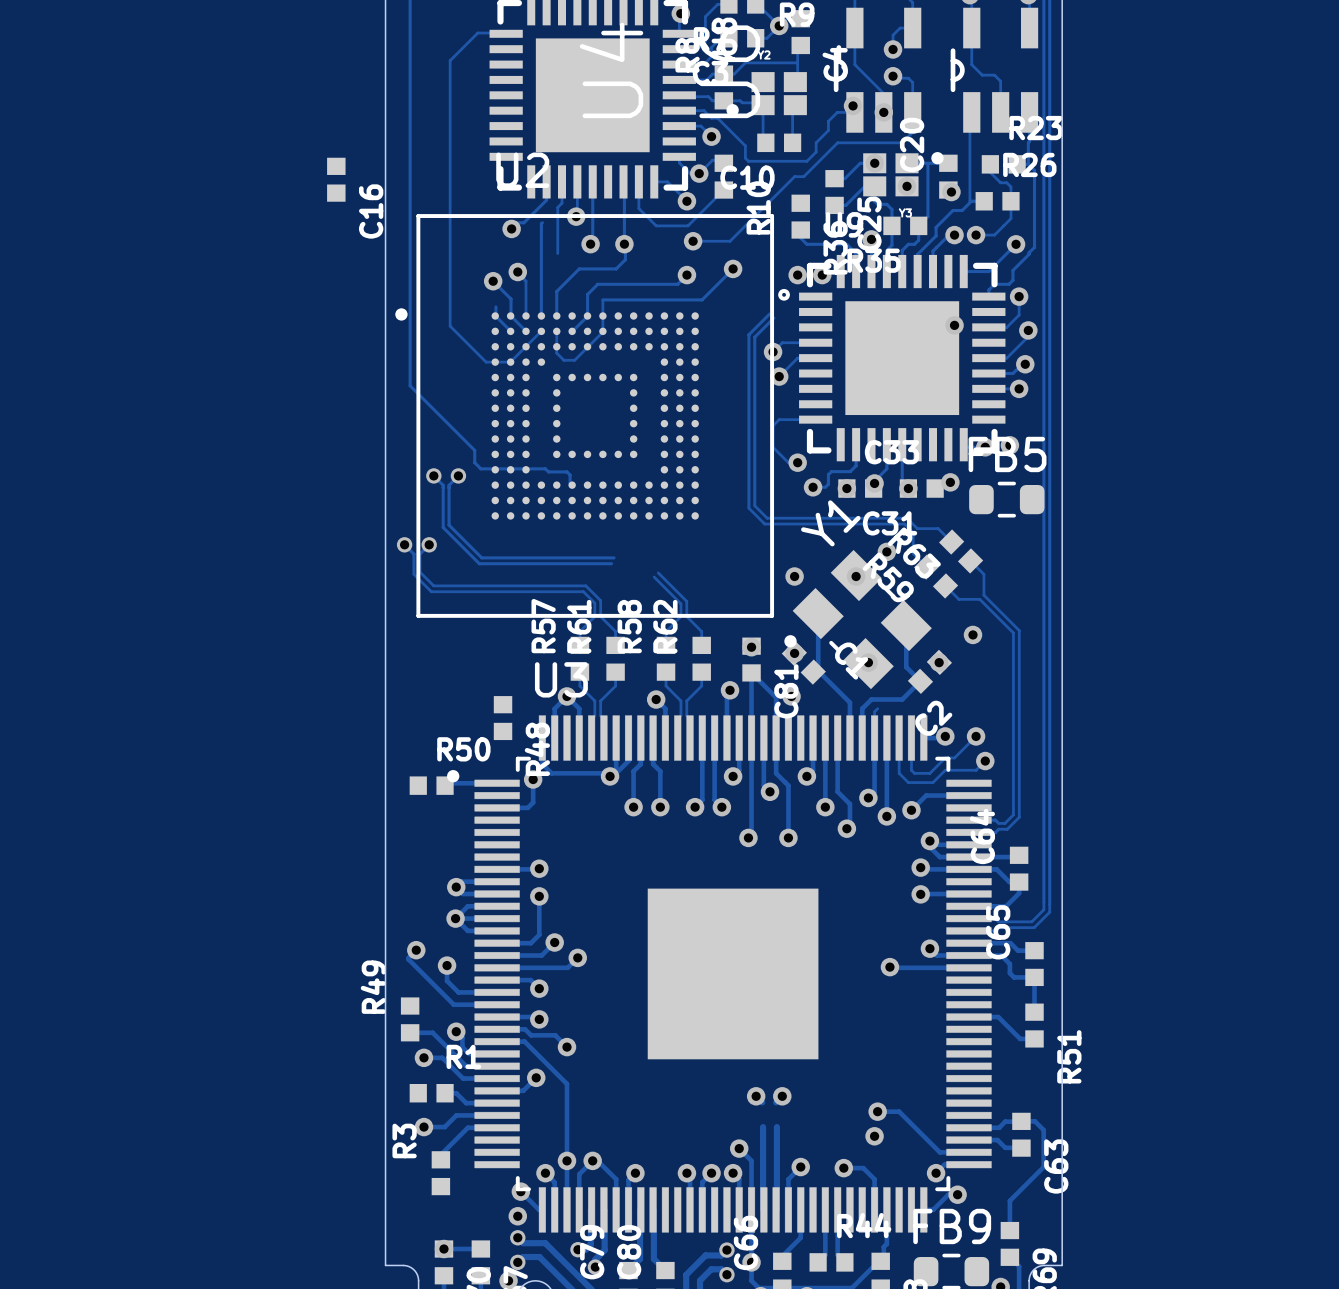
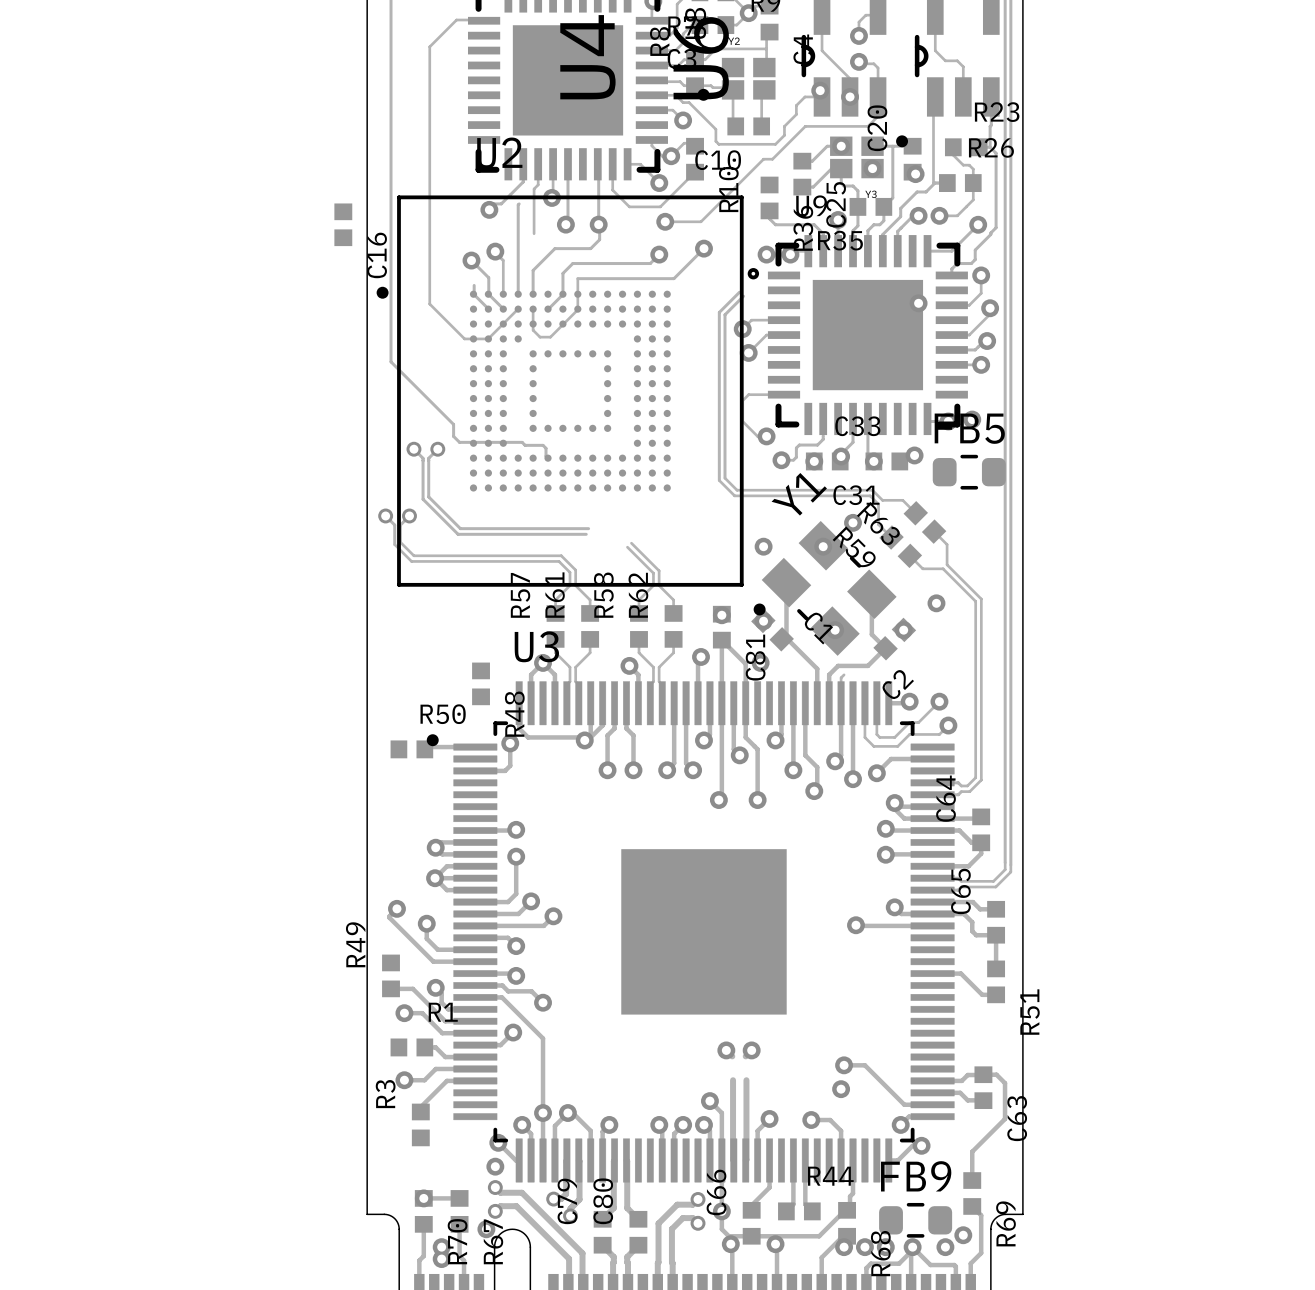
C16 position: (336, 179) -> (343, 224)

